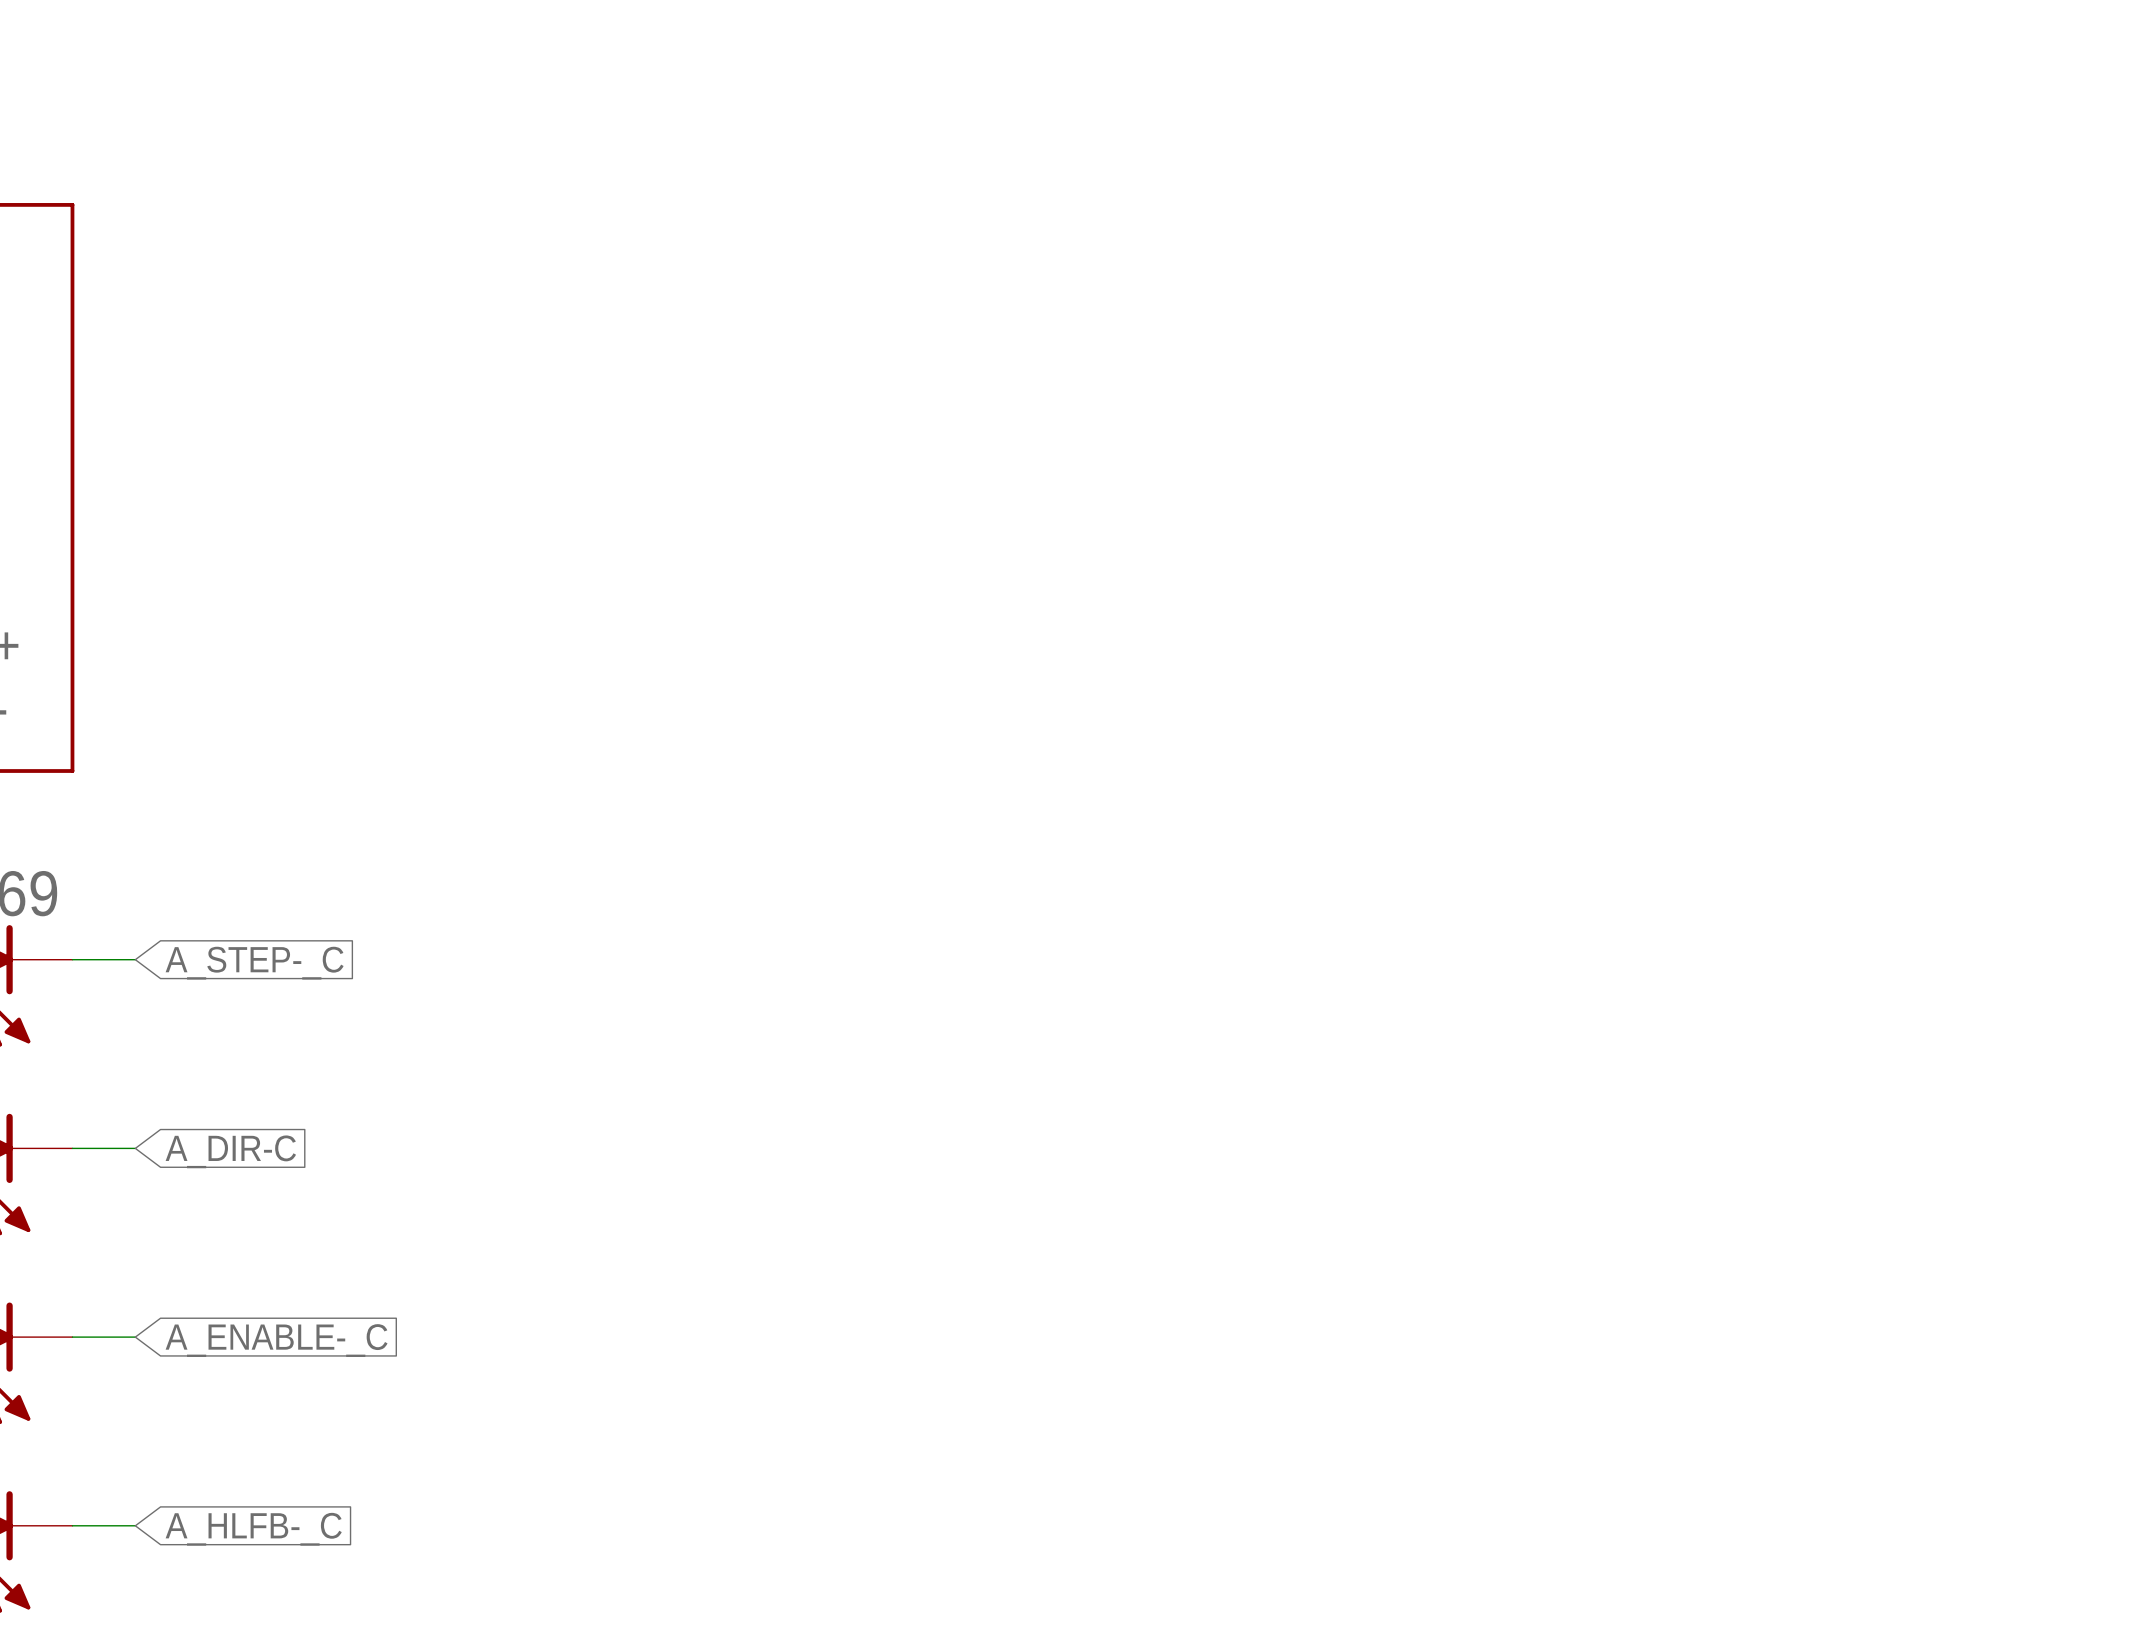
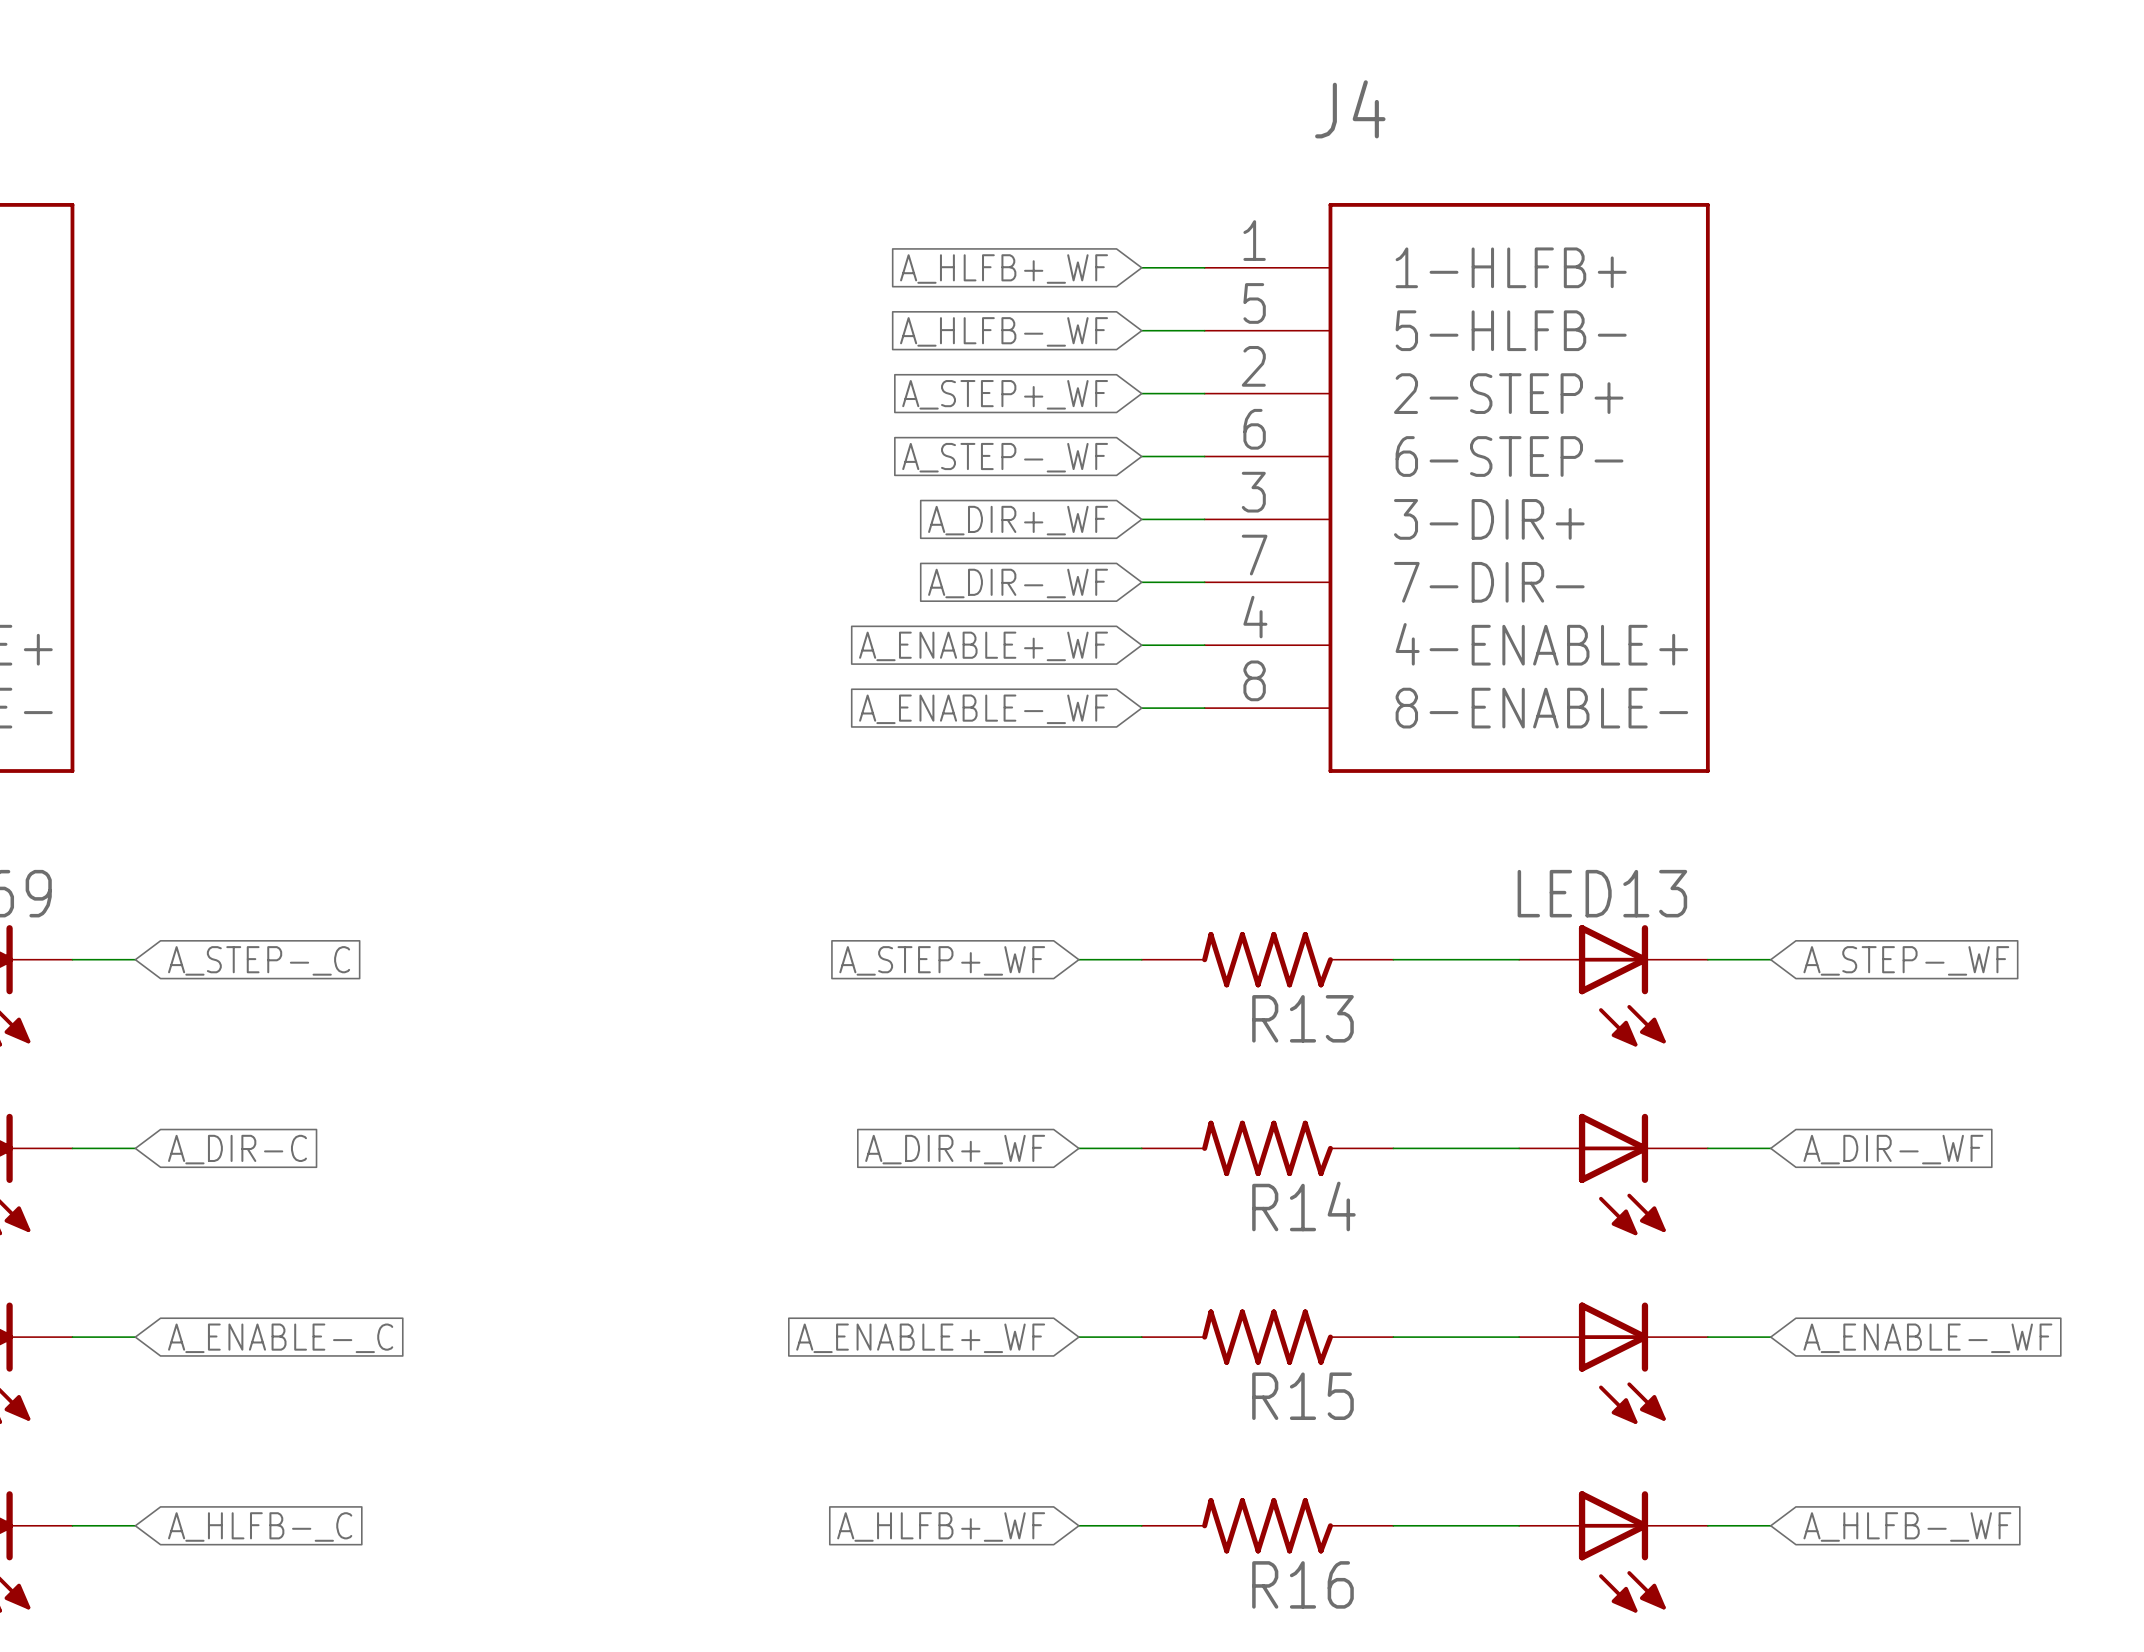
wire: none -> (1141, 267) (1204, 267)
global label: none -> A_HLFB+_WF (1004, 269)
wire: none -> (1141, 330) (1204, 330)
global label: none -> A_HLFB-_WF (1004, 331)
wire: none -> (1141, 393) (1204, 393)
global label: none -> A_STEP+_WF (1005, 394)
wire: none -> (1141, 456) (1204, 456)
global label: none -> A_STEP-_WF (1005, 457)
J4: none -> (1457, 487)
wire: none -> (1141, 519) (1204, 519)
global label: none -> A_DIR+_WF (1018, 520)
wire: none -> (1141, 582) (1204, 582)
global label: none -> A_DIR-_WF (1018, 583)
wire: none -> (1141, 645) (1204, 645)
global label: none -> A_ENABLE+_WF (983, 646)
wire: none -> (1141, 708) (1204, 708)
global label: none -> A_ENABLE-_WF (983, 709)
wire: none -> (1078, 959) (1141, 959)
R13: none -> (1267, 959)
wire: none -> (1393, 959) (1519, 959)
wire: none -> (1707, 959) (1770, 959)
global label: none -> A_STEP+_WF (942, 960)
global label: none -> A_STEP-_WF (1906, 960)
LED13: none -> (1613, 985)
wire: none -> (1078, 1148) (1141, 1148)
R14: none -> (1267, 1148)
wire: none -> (1393, 1148) (1519, 1148)
wire: none -> (1707, 1148) (1770, 1148)
global label: none -> A_DIR+_WF (955, 1149)
global label: none -> A_DIR-_WF (1893, 1149)
part: none -> (1613, 1174)
wire: none -> (1078, 1337) (1141, 1337)
R15: none -> (1267, 1337)
wire: none -> (1393, 1337) (1519, 1337)
wire: none -> (1707, 1337) (1770, 1337)
global label: none -> A_ENABLE+_WF (920, 1338)
global label: none -> A_ENABLE-_WF (1927, 1338)
part: none -> (1613, 1363)
wire: none -> (1078, 1525) (1141, 1525)
R16: none -> (1267, 1525)
wire: none -> (1393, 1525) (1519, 1525)
wire: none -> (1707, 1525) (1770, 1525)
global label: none -> A_HLFB+_WF (941, 1526)
global label: none -> A_HLFB-_WF (1907, 1526)
part: none -> (1613, 1551)

